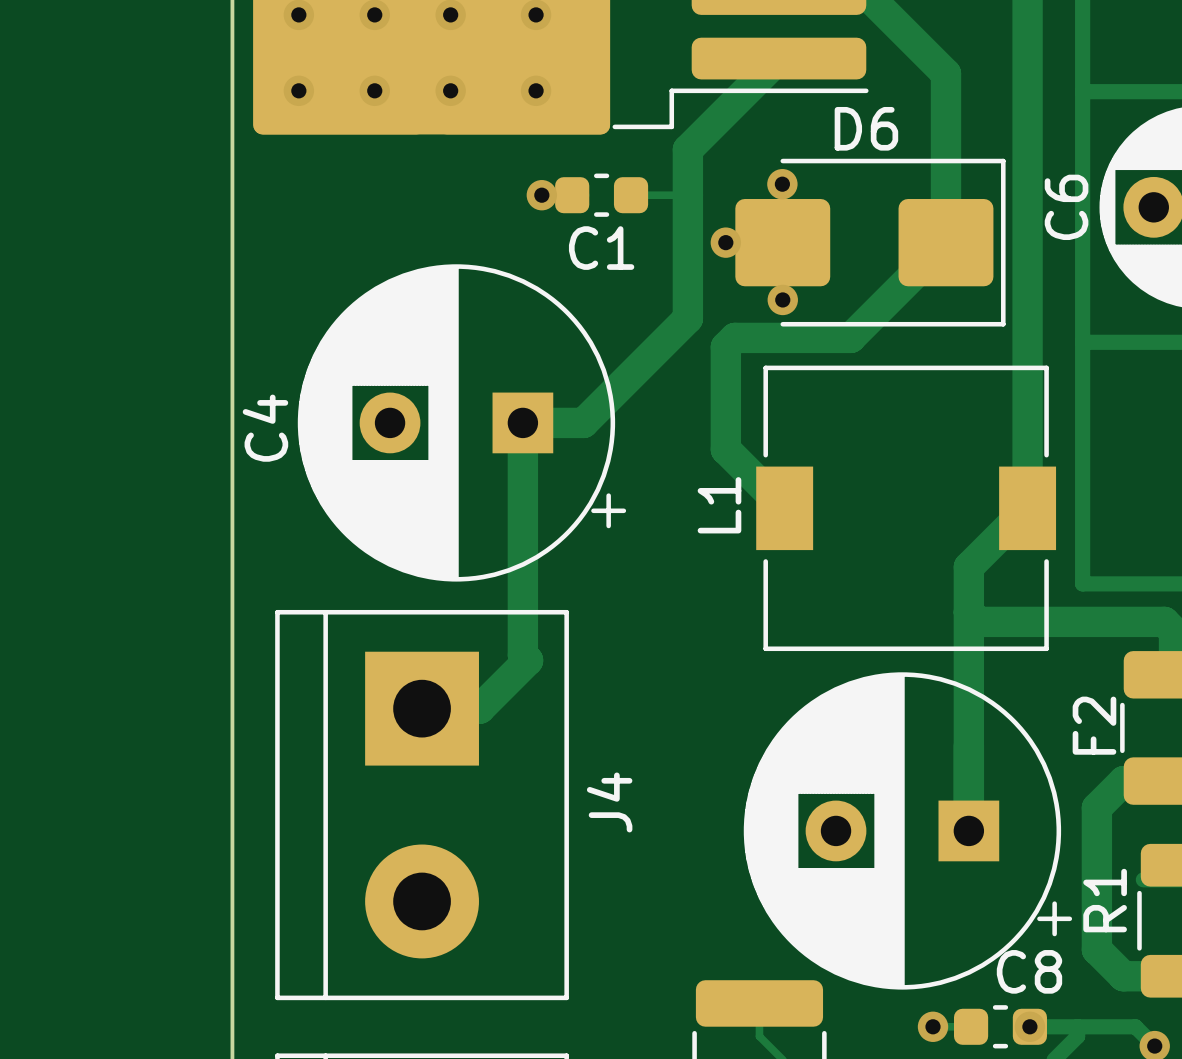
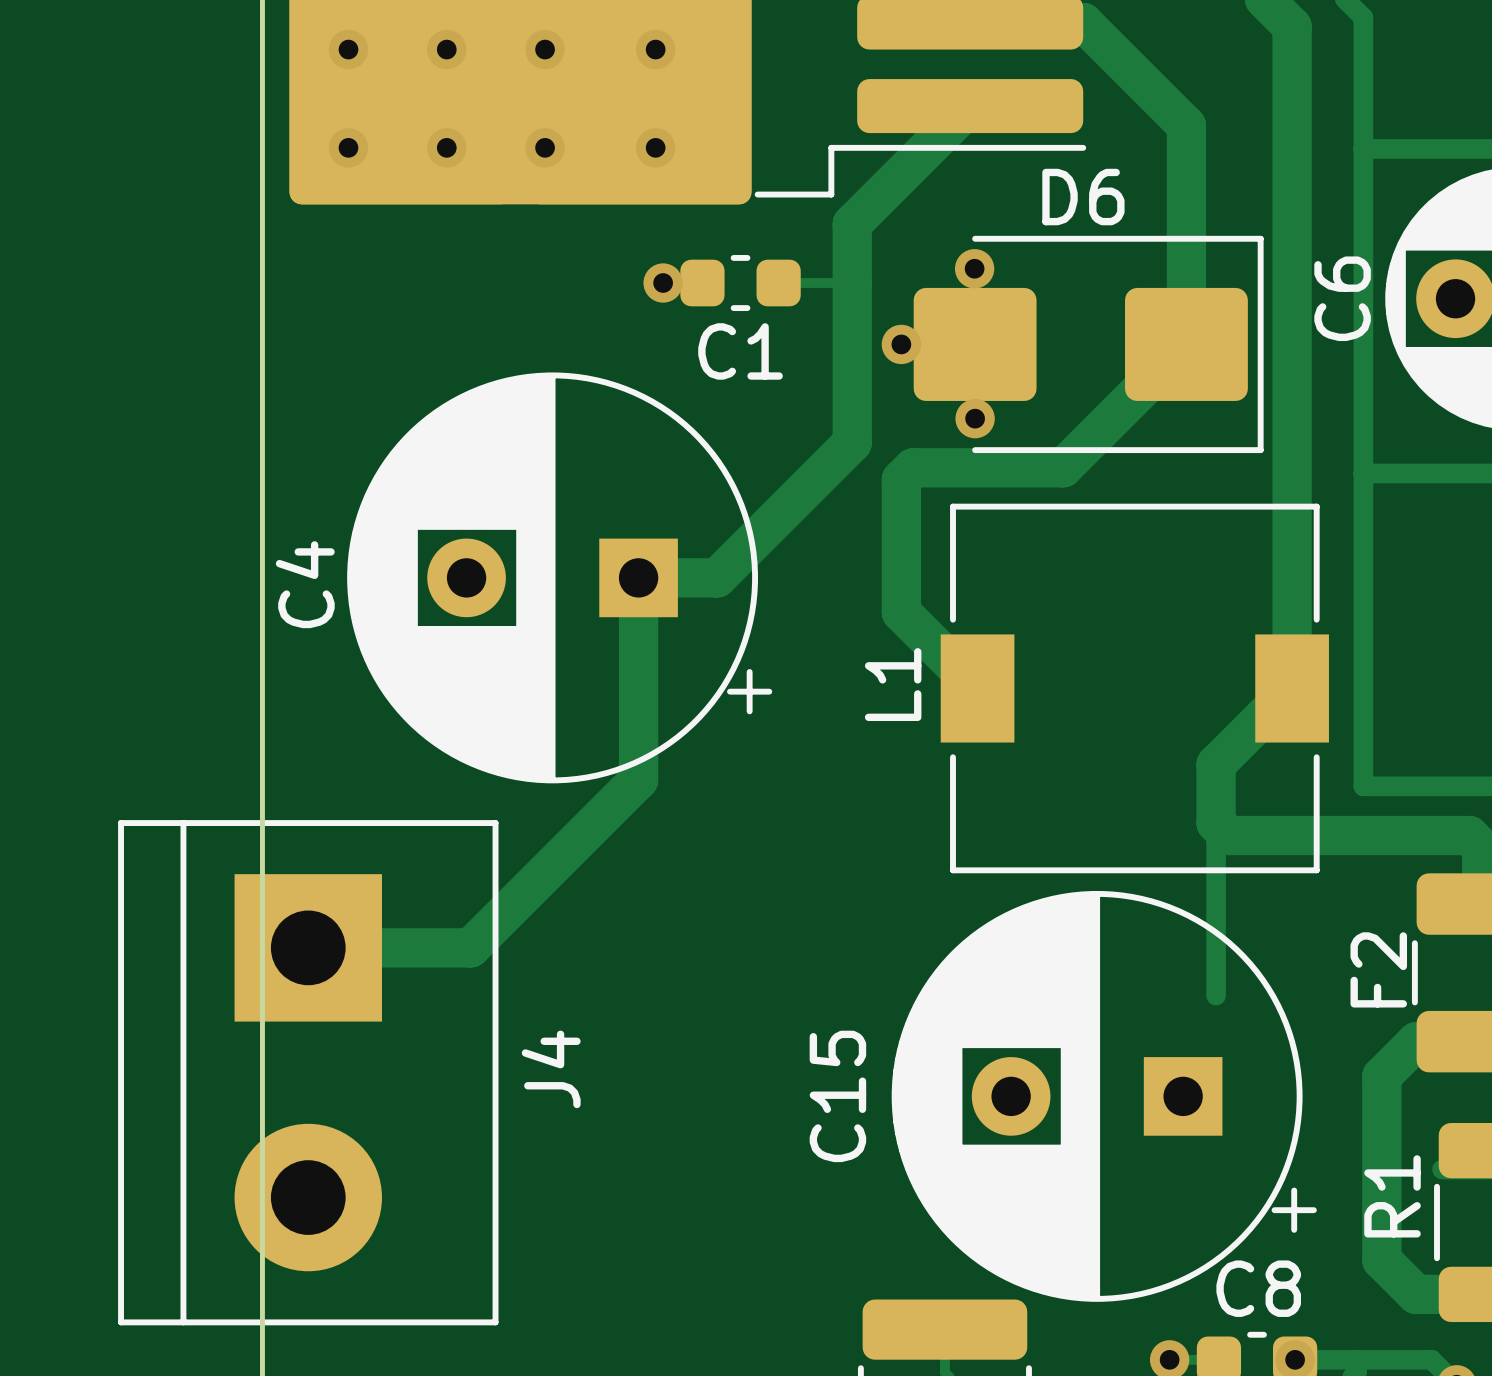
track: (522, 578) (522, 655) (528, 660) (479, 708) (422, 708) -> (638, 779) (470, 947) (308, 947)
track: (968, 612) (968, 830) -> none
J4 position: (422, 805) -> (308, 1072)
C15 name: none -> C15 (837, 1096)
C15 position: (907, 830) -> (1104, 1096)
C8 name position: C8 (1029, 971) -> C8 (1258, 1288)

